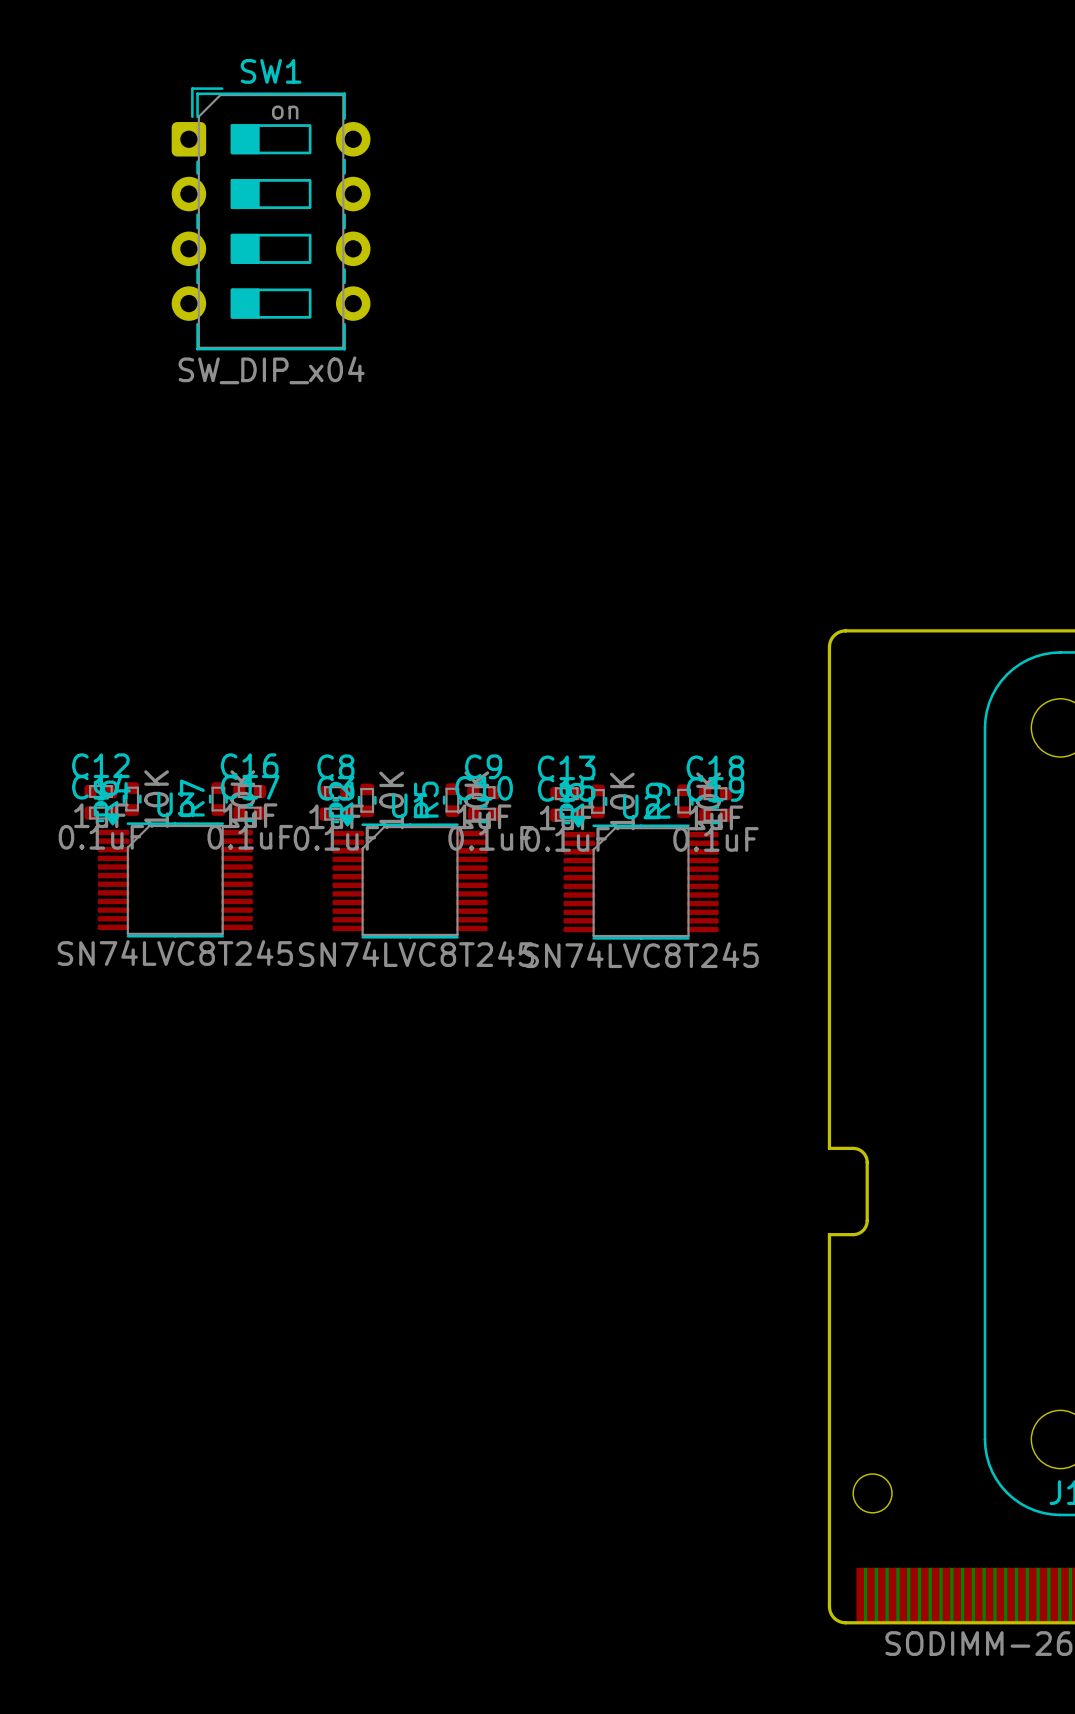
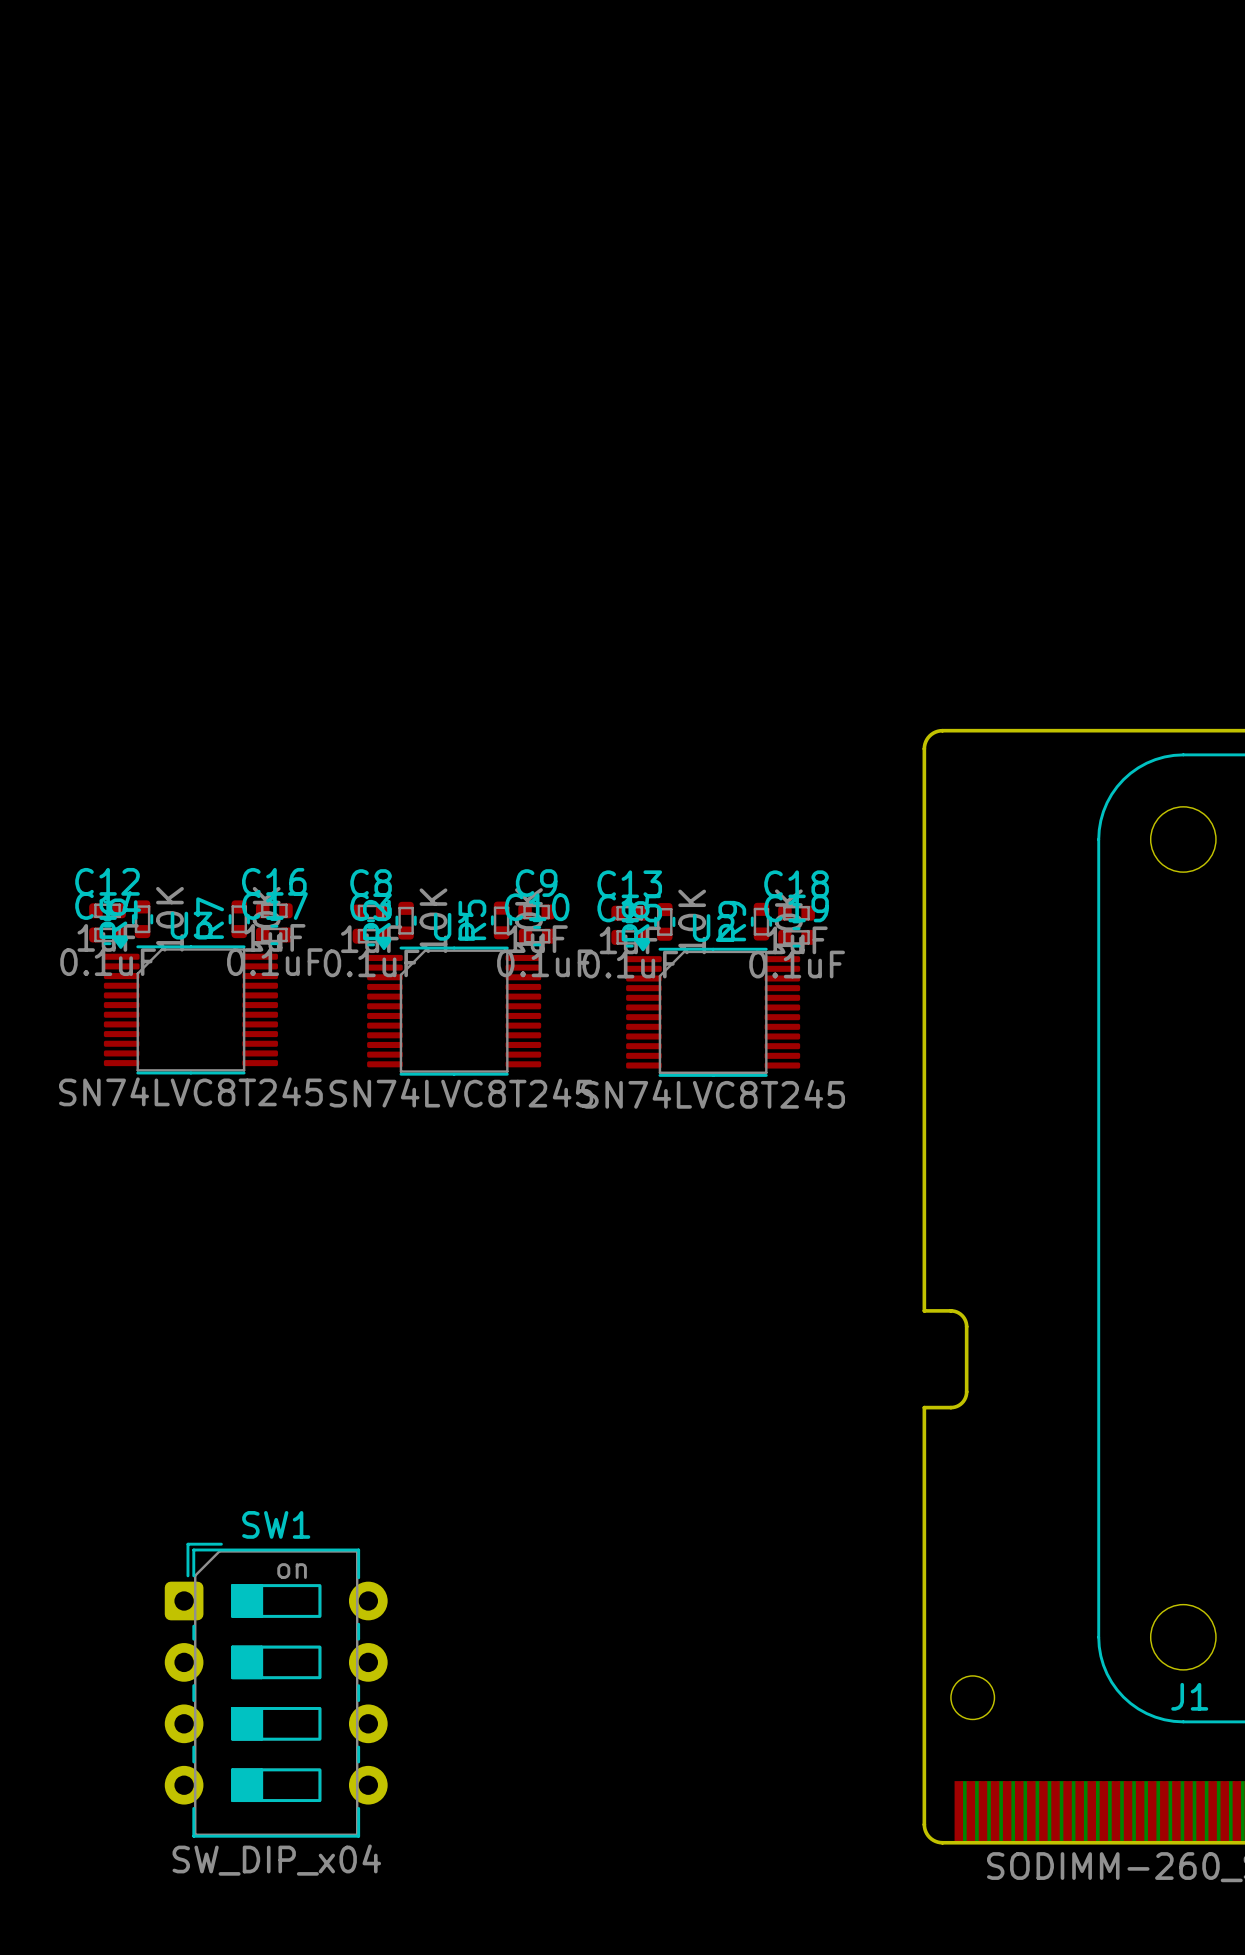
SW1 position: (271, 218) -> (276, 1690)

